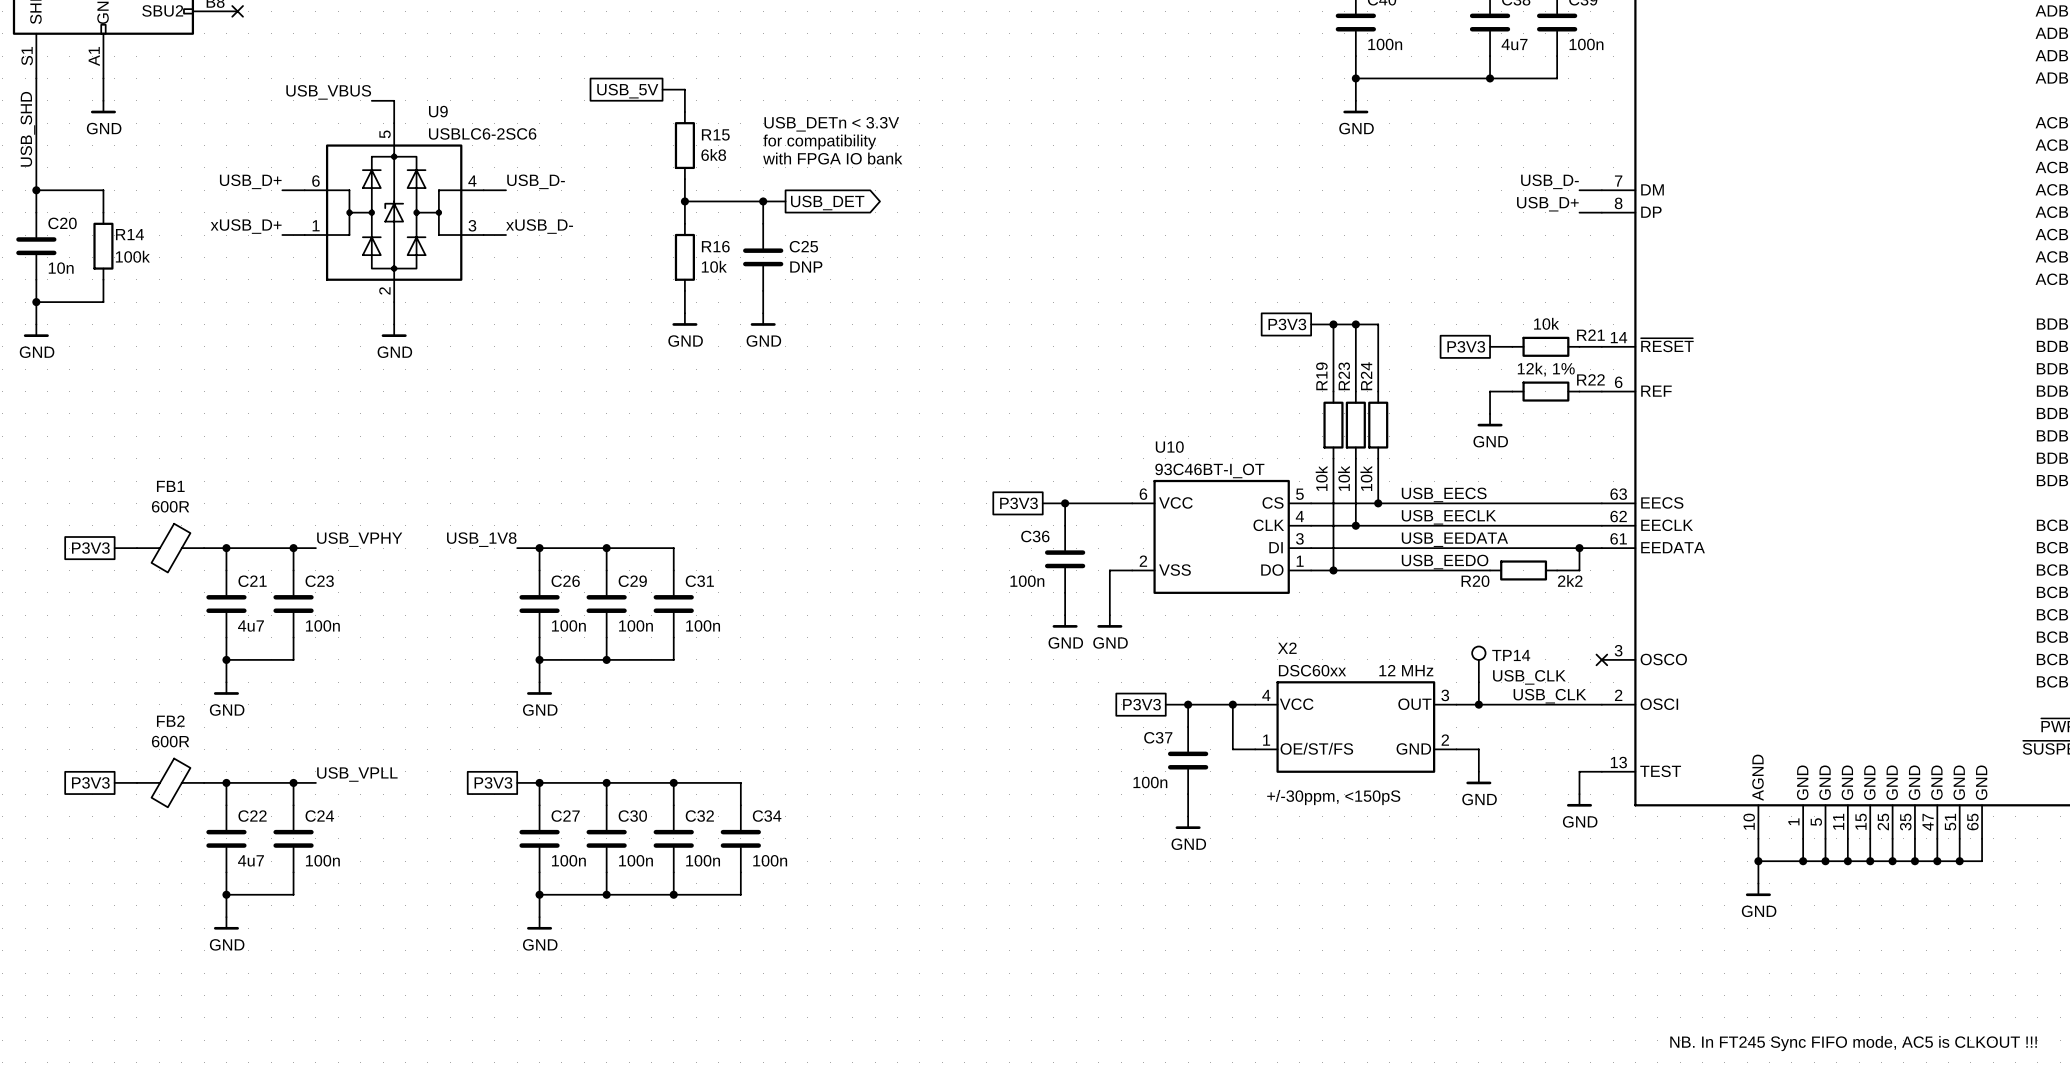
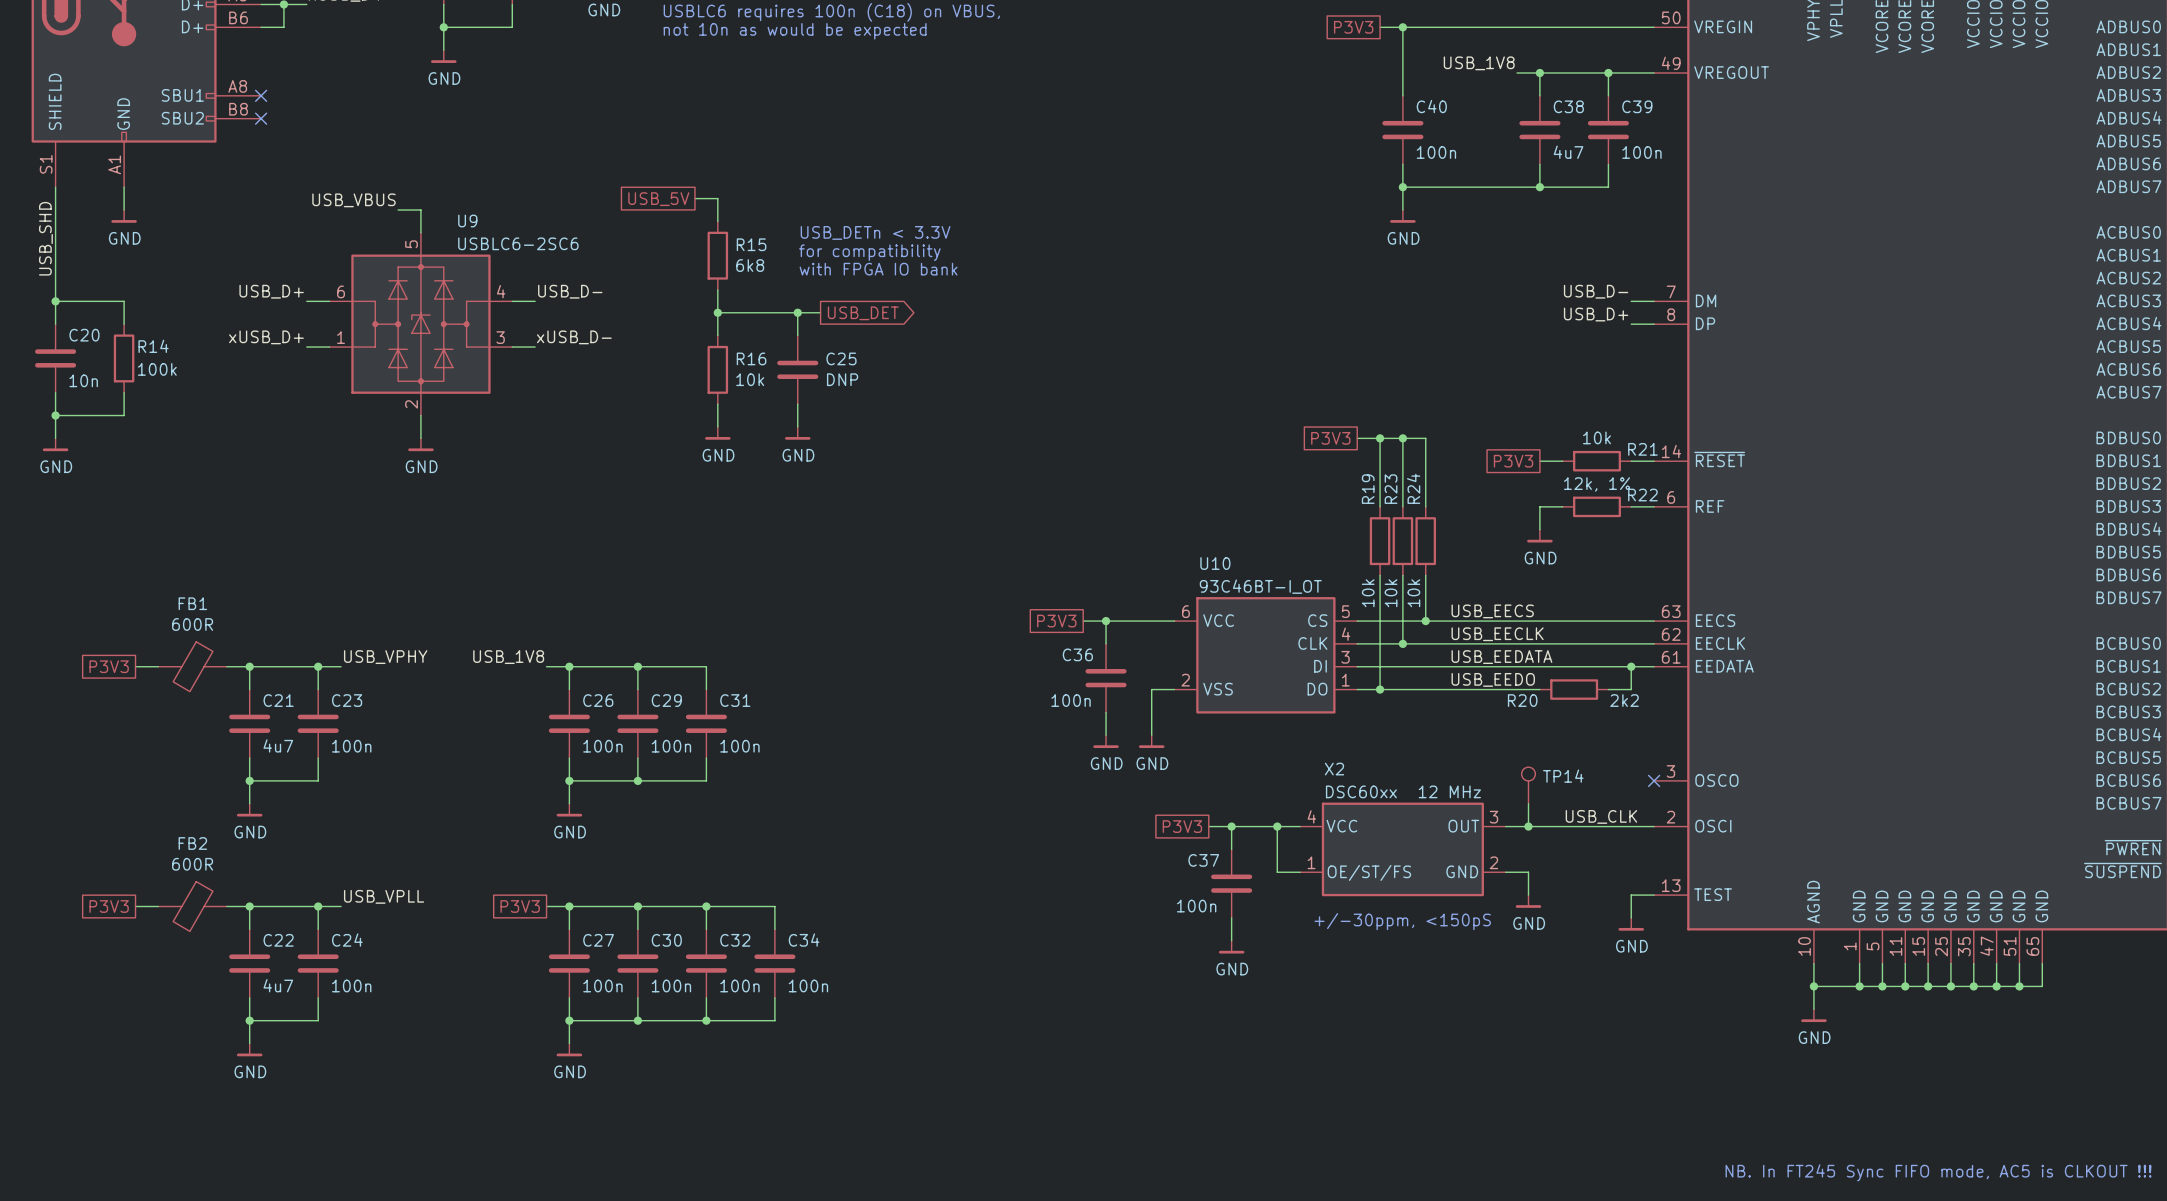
TP14 value: USB_CLK (1529, 677) -> none

